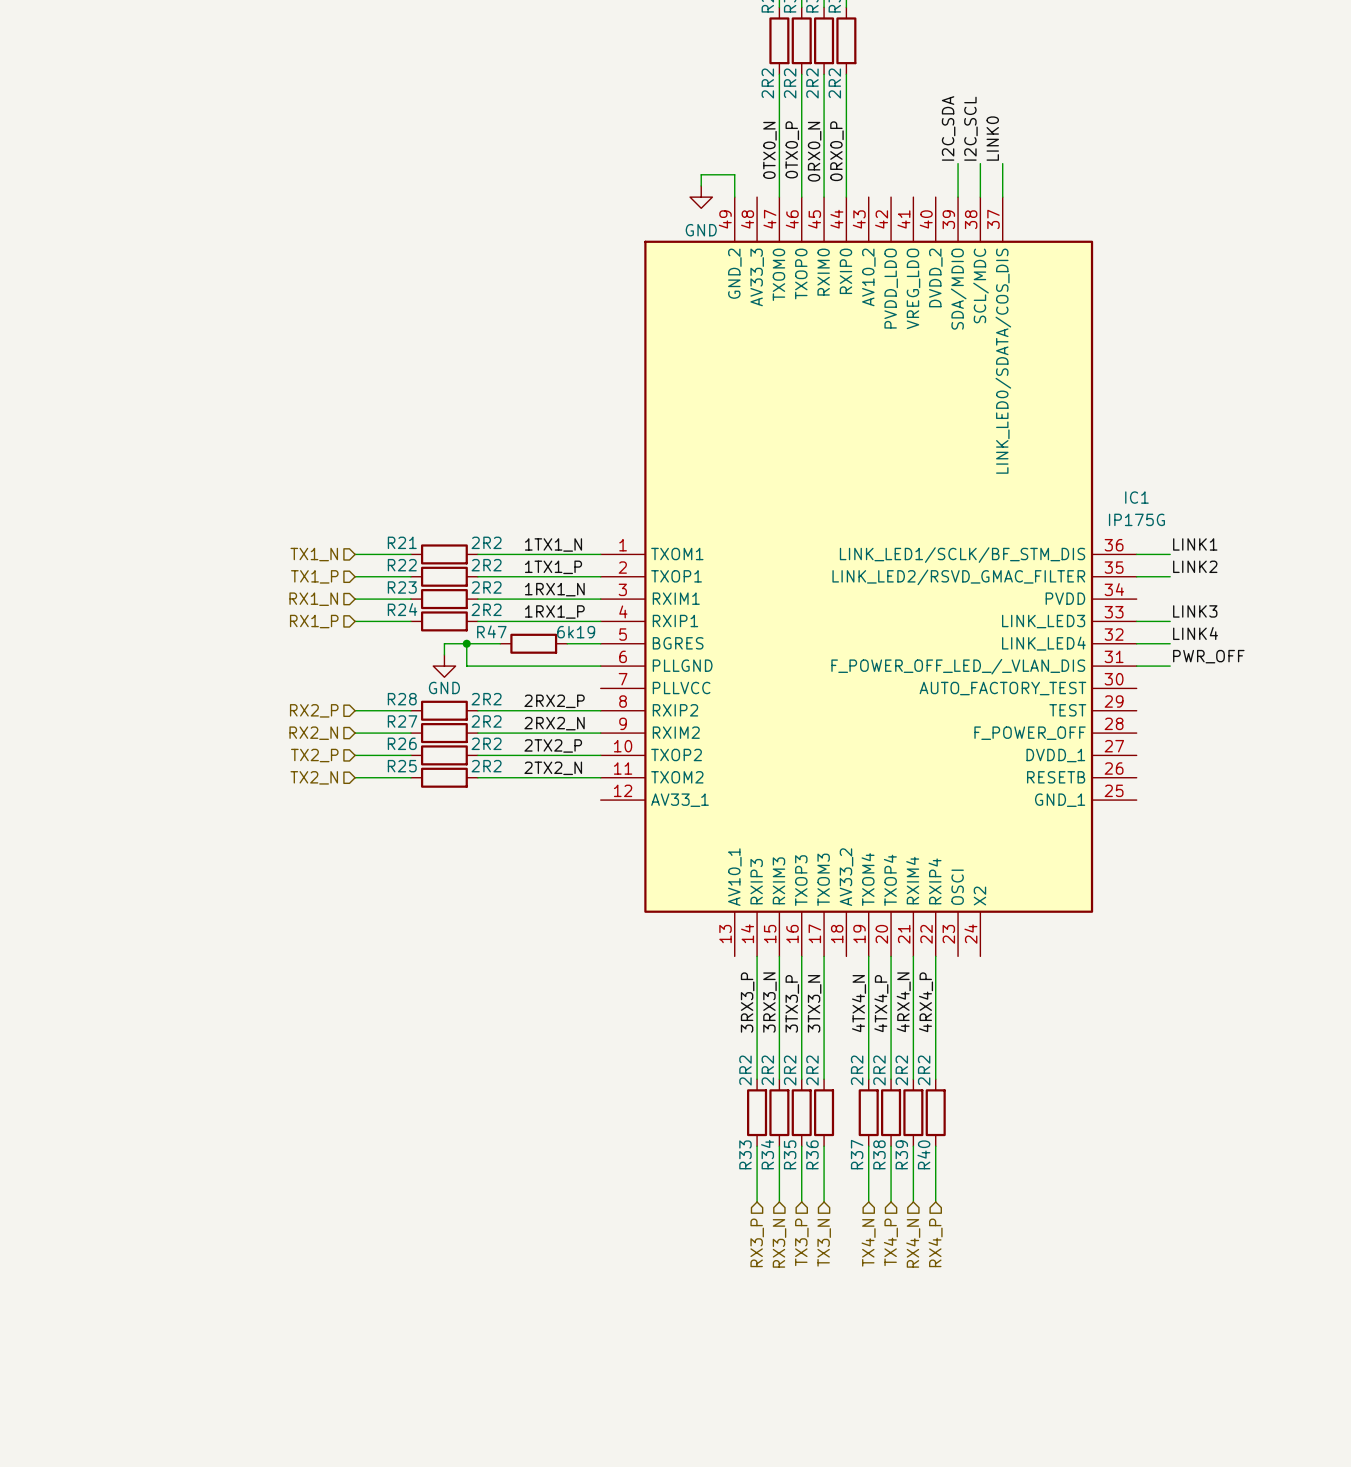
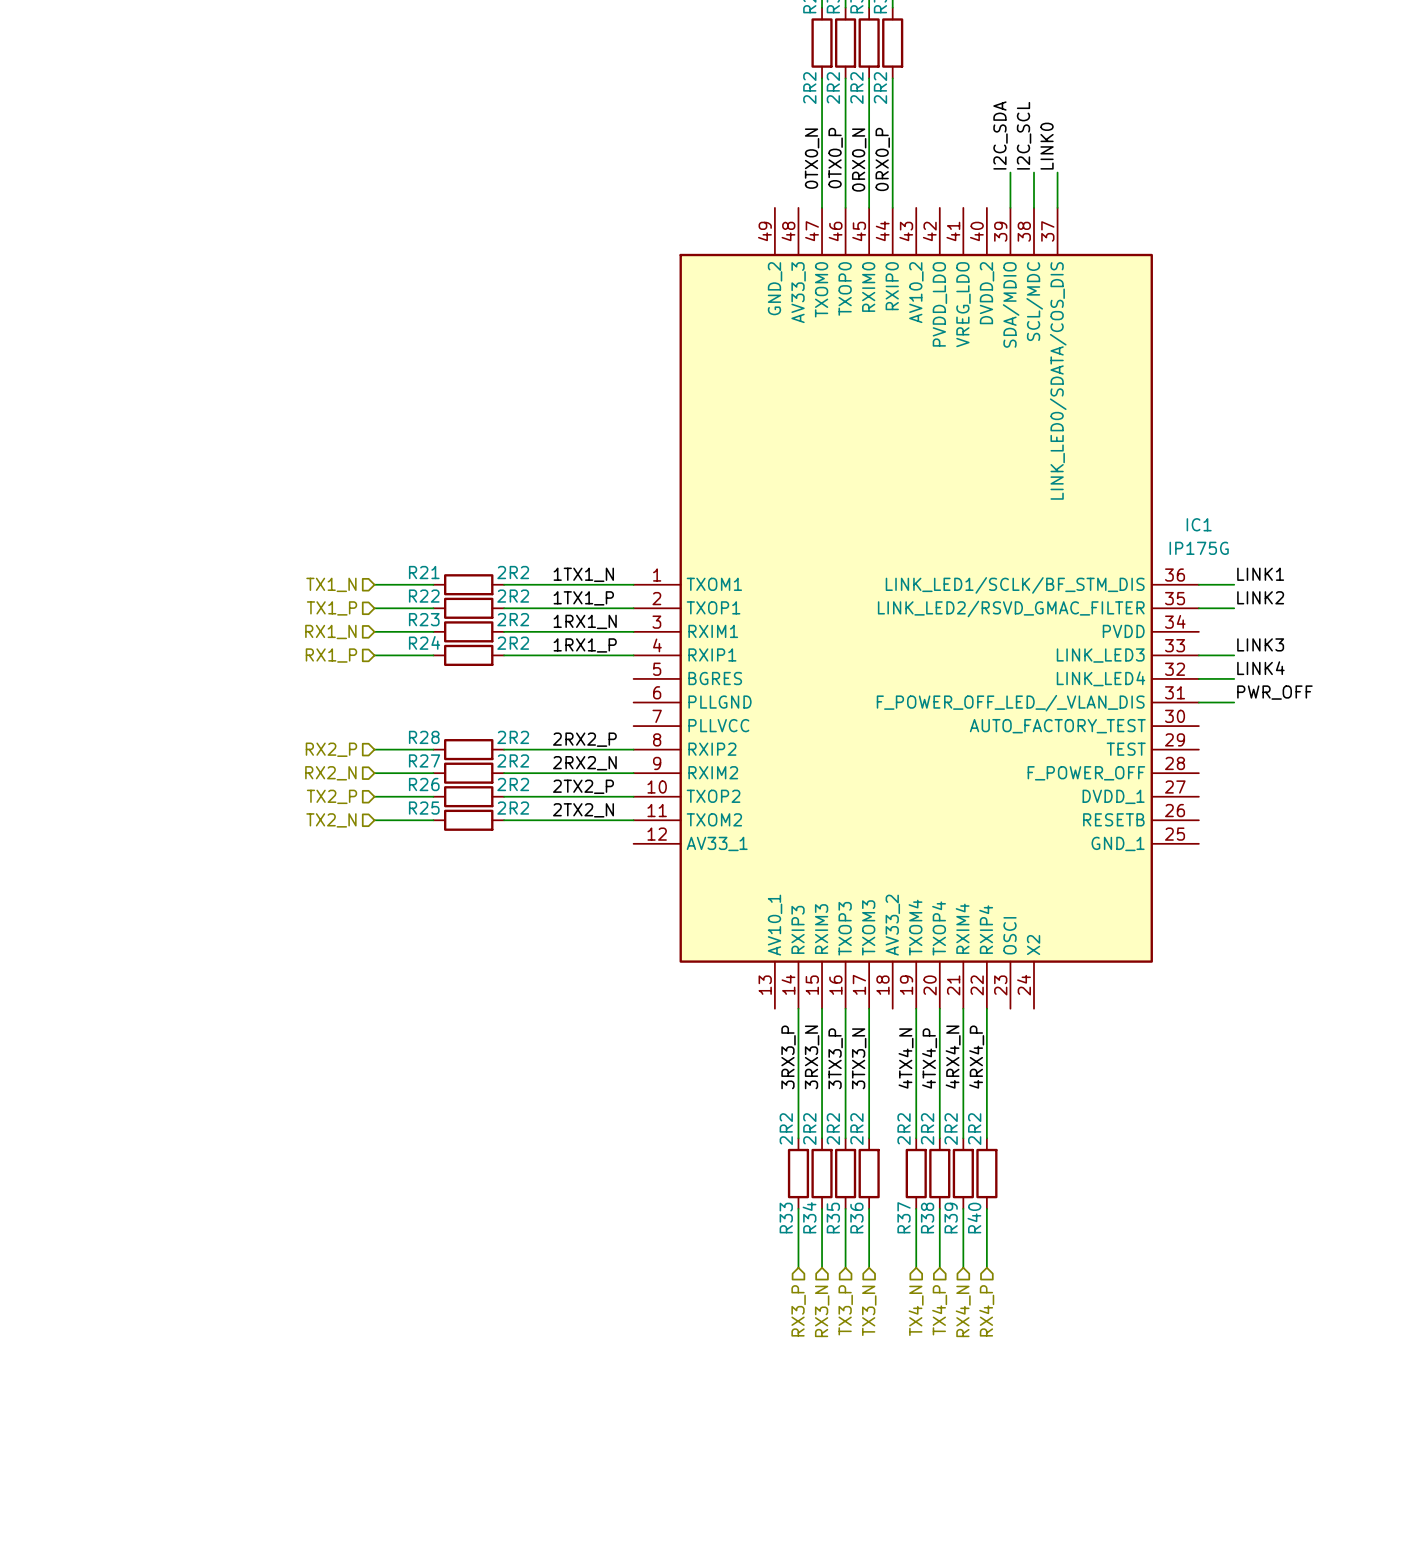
wire: (701, 185) (701, 174) (734, 174) (734, 197) -> none
power symbol: GND (701, 197) -> none
wire: (466, 643) (466, 666) (600, 666) -> none
junction: (466, 643) -> none
wire: (500, 643) (444, 643) (444, 654) -> none
R47: 6k19 (533, 643) -> none
wire: (567, 643) (600, 643) -> none
power symbol: GND (444, 666) -> none

